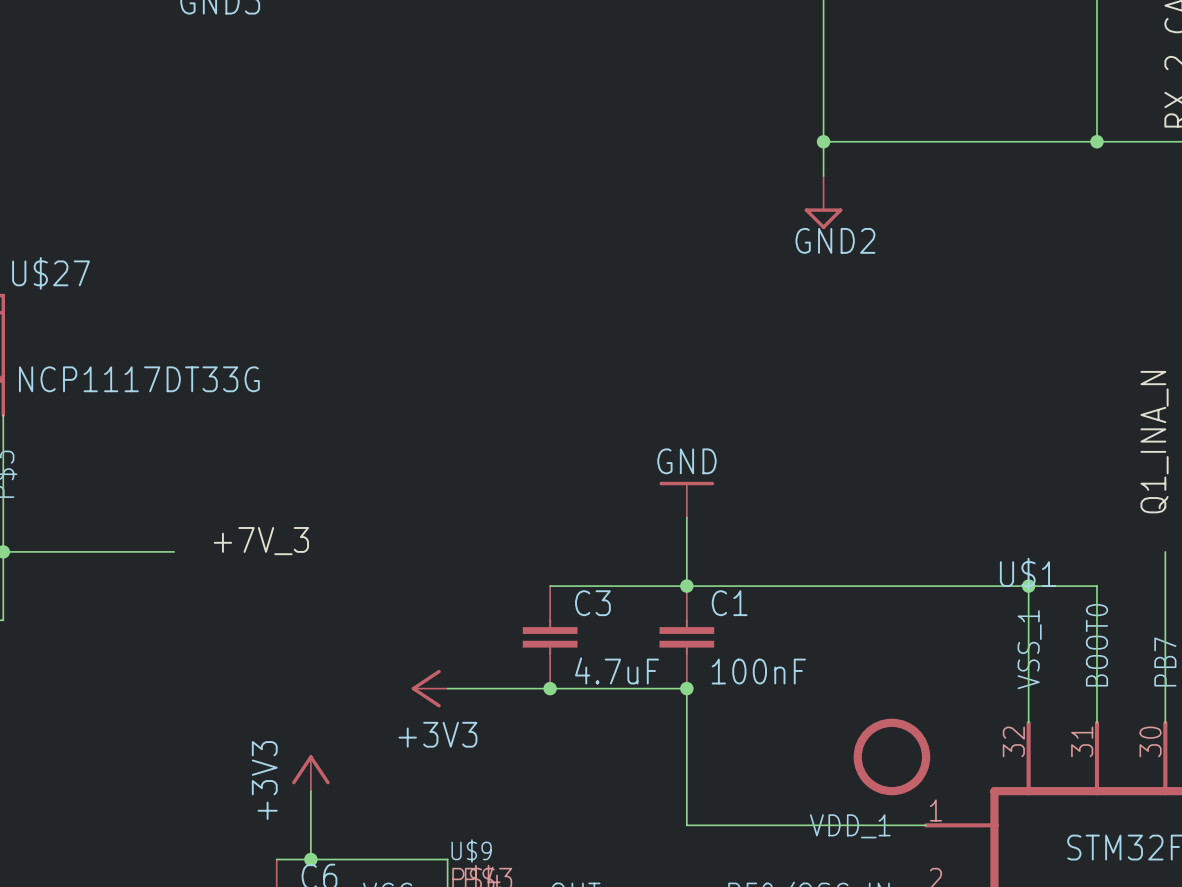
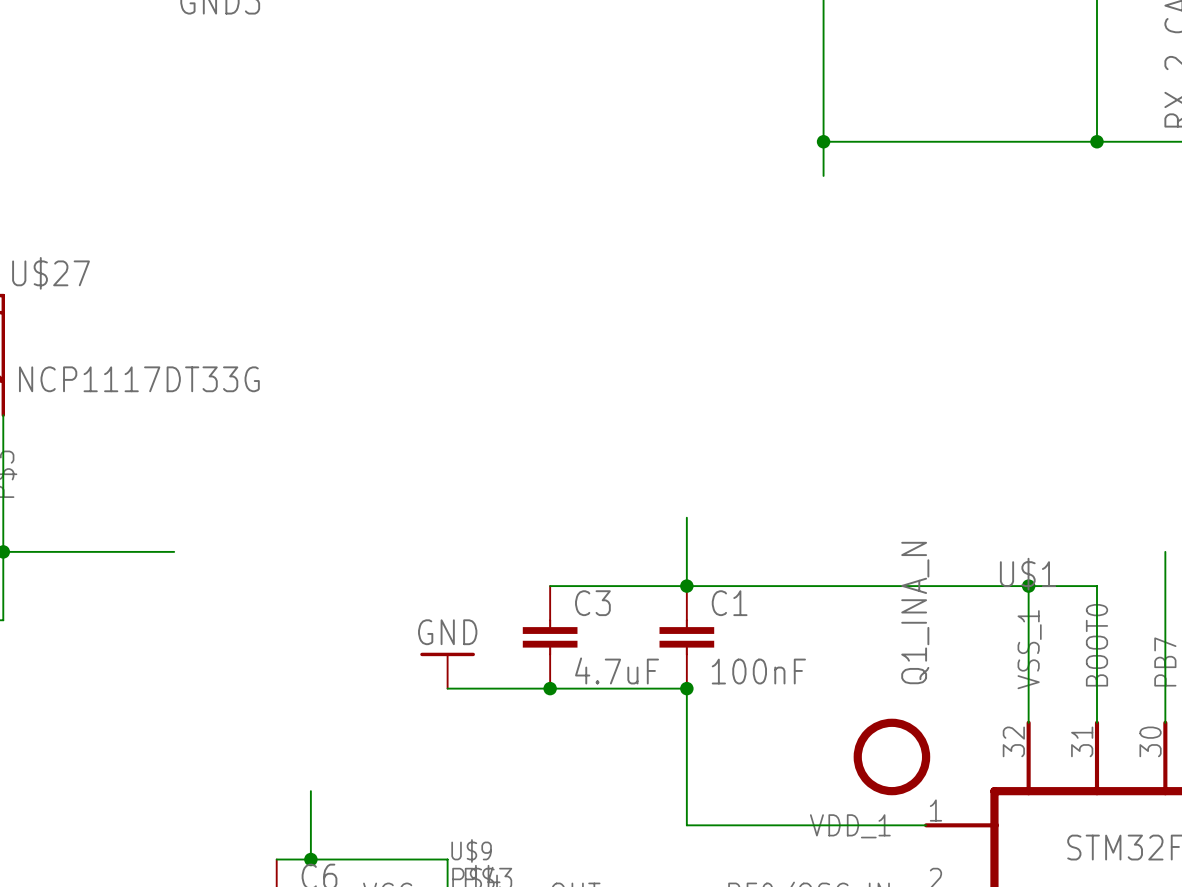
power symbol: GND2 (823, 202) -> none
label position: Q1_INA_N (1154, 442) -> Q1_INA_N (915, 613)
power symbol: GND (686, 499) -> none
label: +7V_3 (261, 541) -> none
power symbol: none -> GND (447, 670)
power symbol: +3V3 (429, 688) -> none
power symbol: +3V3 (310, 773) -> none

